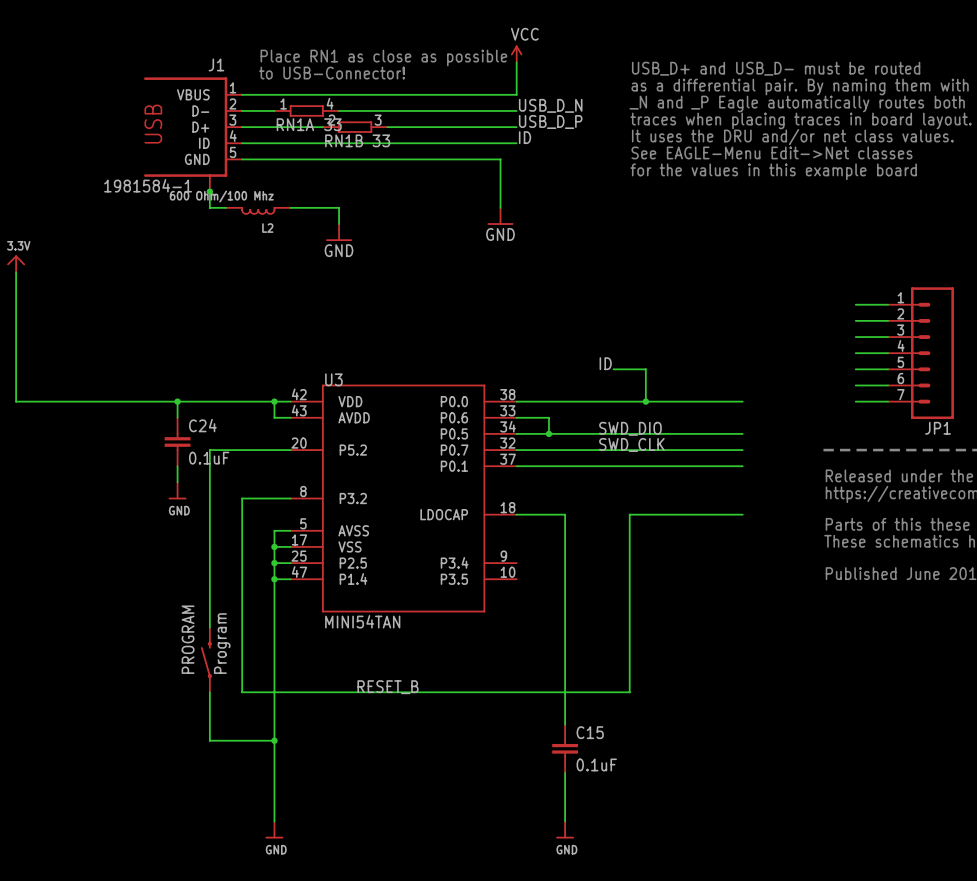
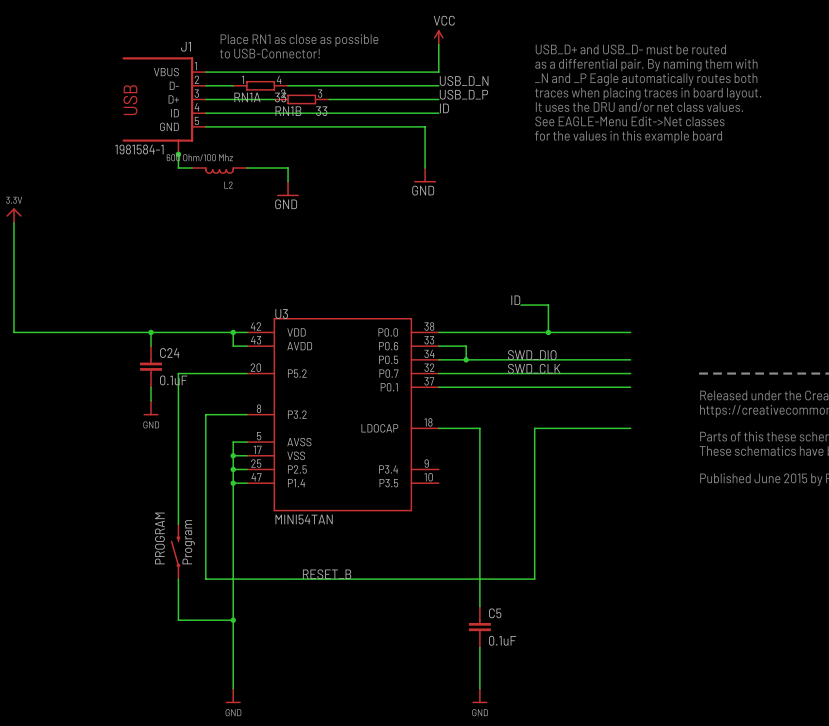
wire: (855, 304) (888, 304) -> none
wire: (855, 320) (888, 320) -> none
wire: (855, 337) (888, 337) -> none
wire: (855, 353) (888, 353) -> none
JP1: (921, 353) -> none
wire: (855, 369) (888, 369) -> none
wire: (855, 385) (888, 385) -> none
wire: (855, 401) (888, 401) -> none
C15 name: C15 (590, 732) -> C5 (495, 613)

